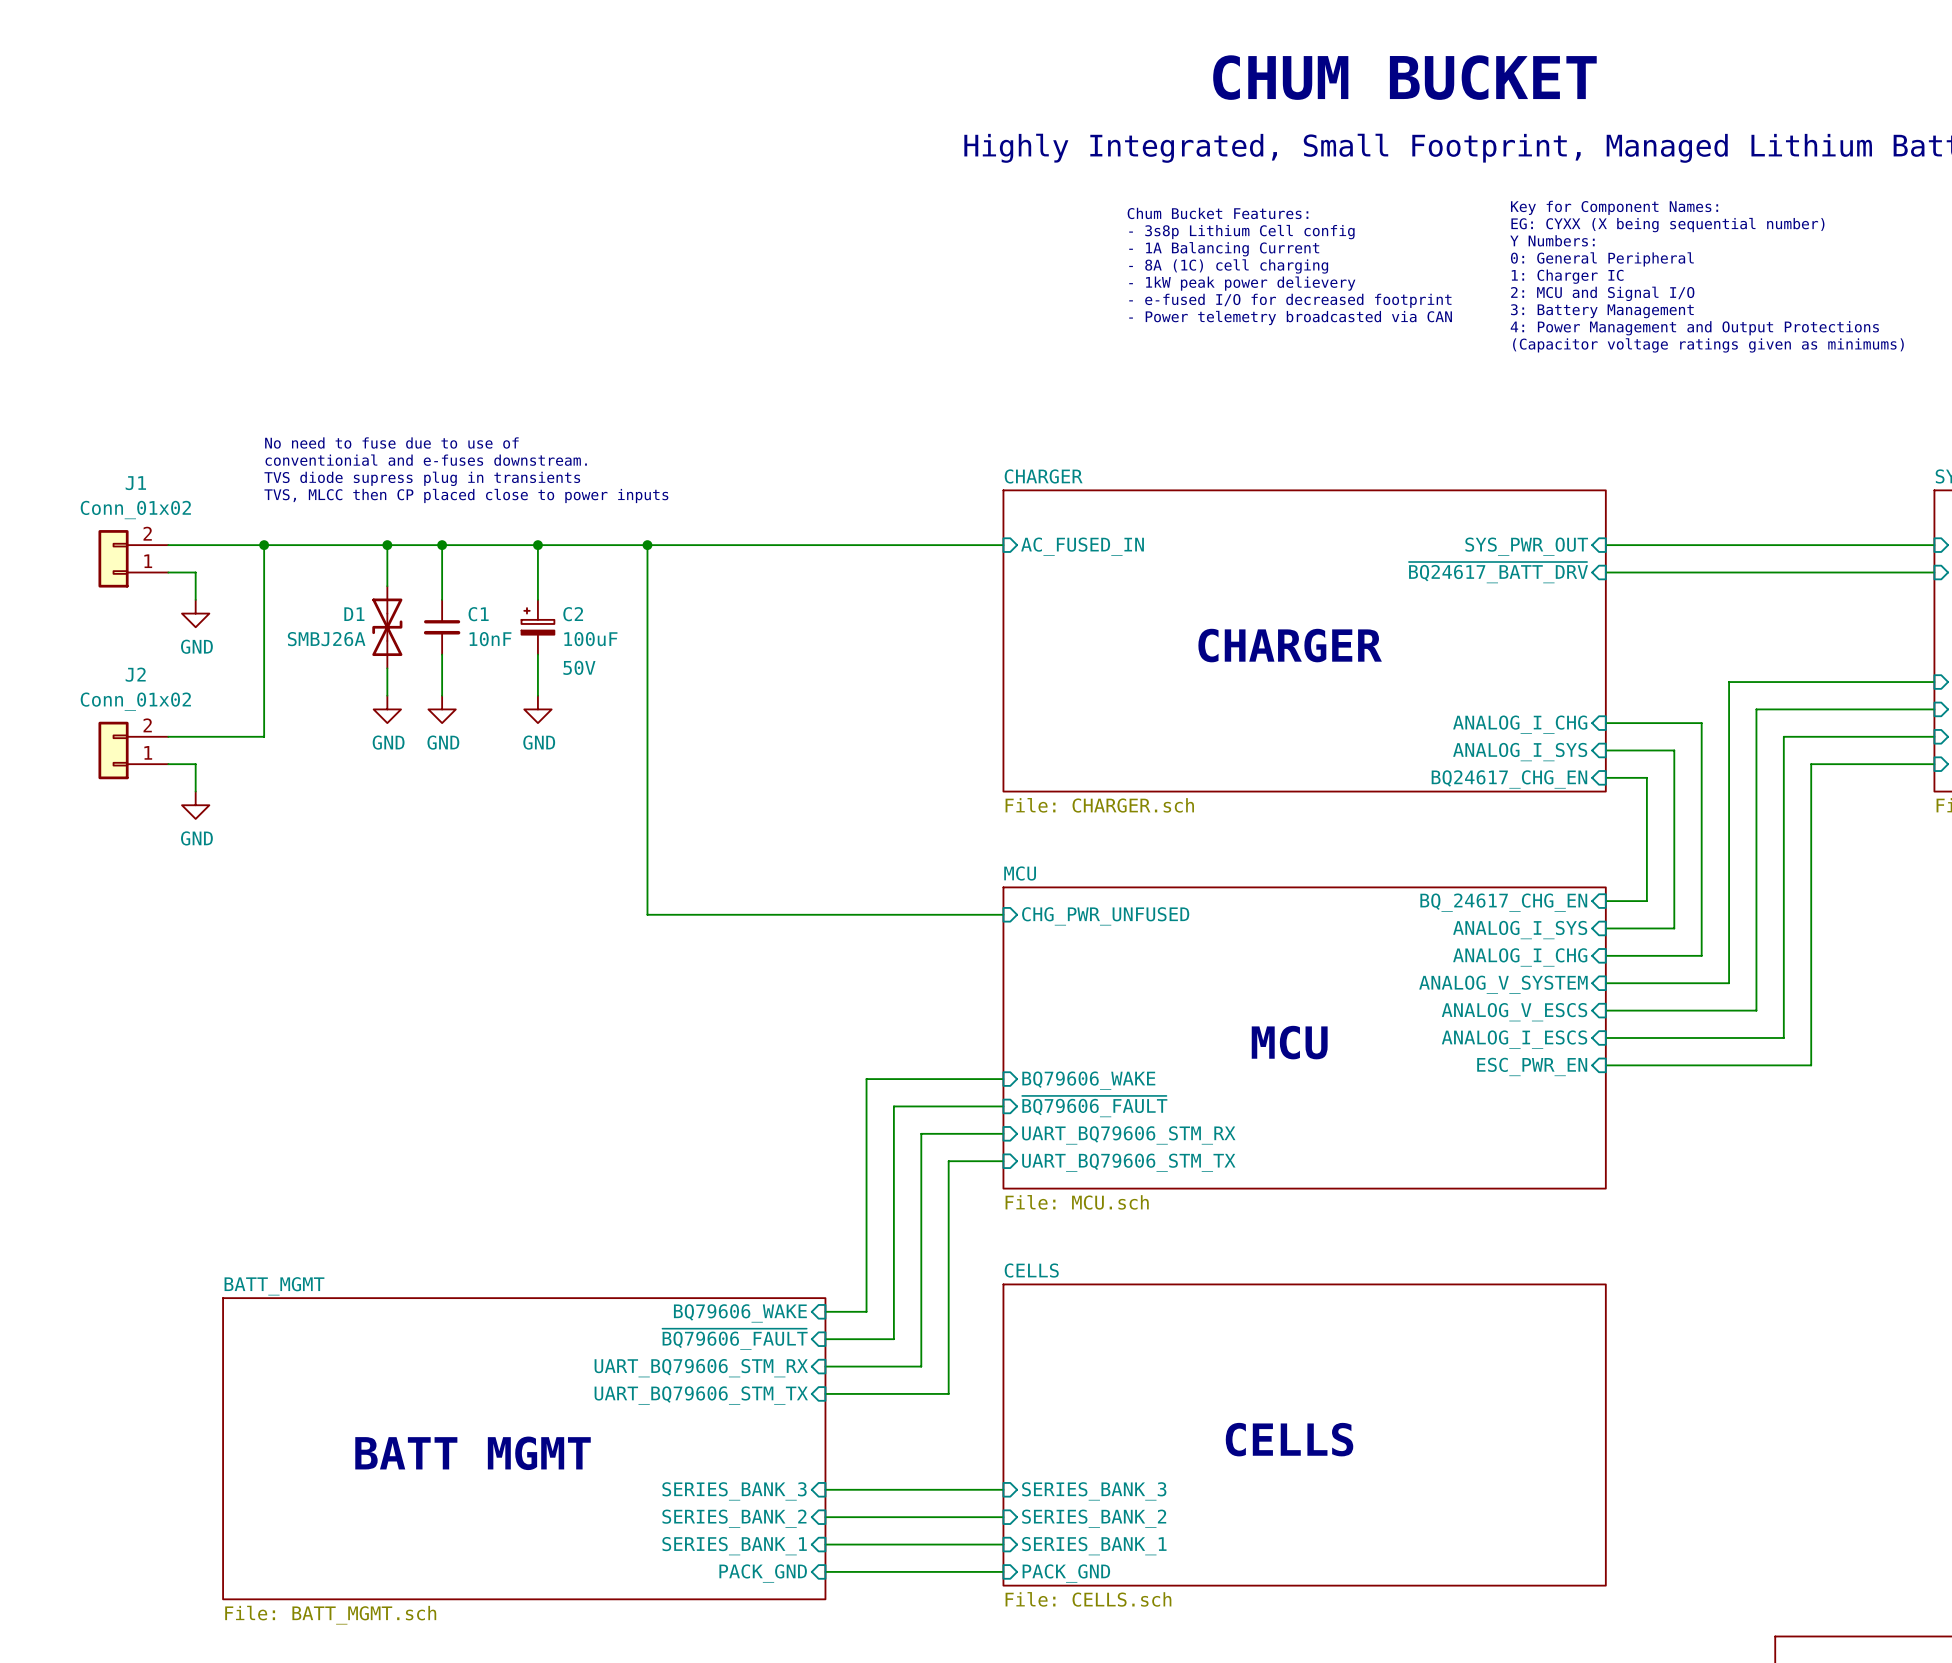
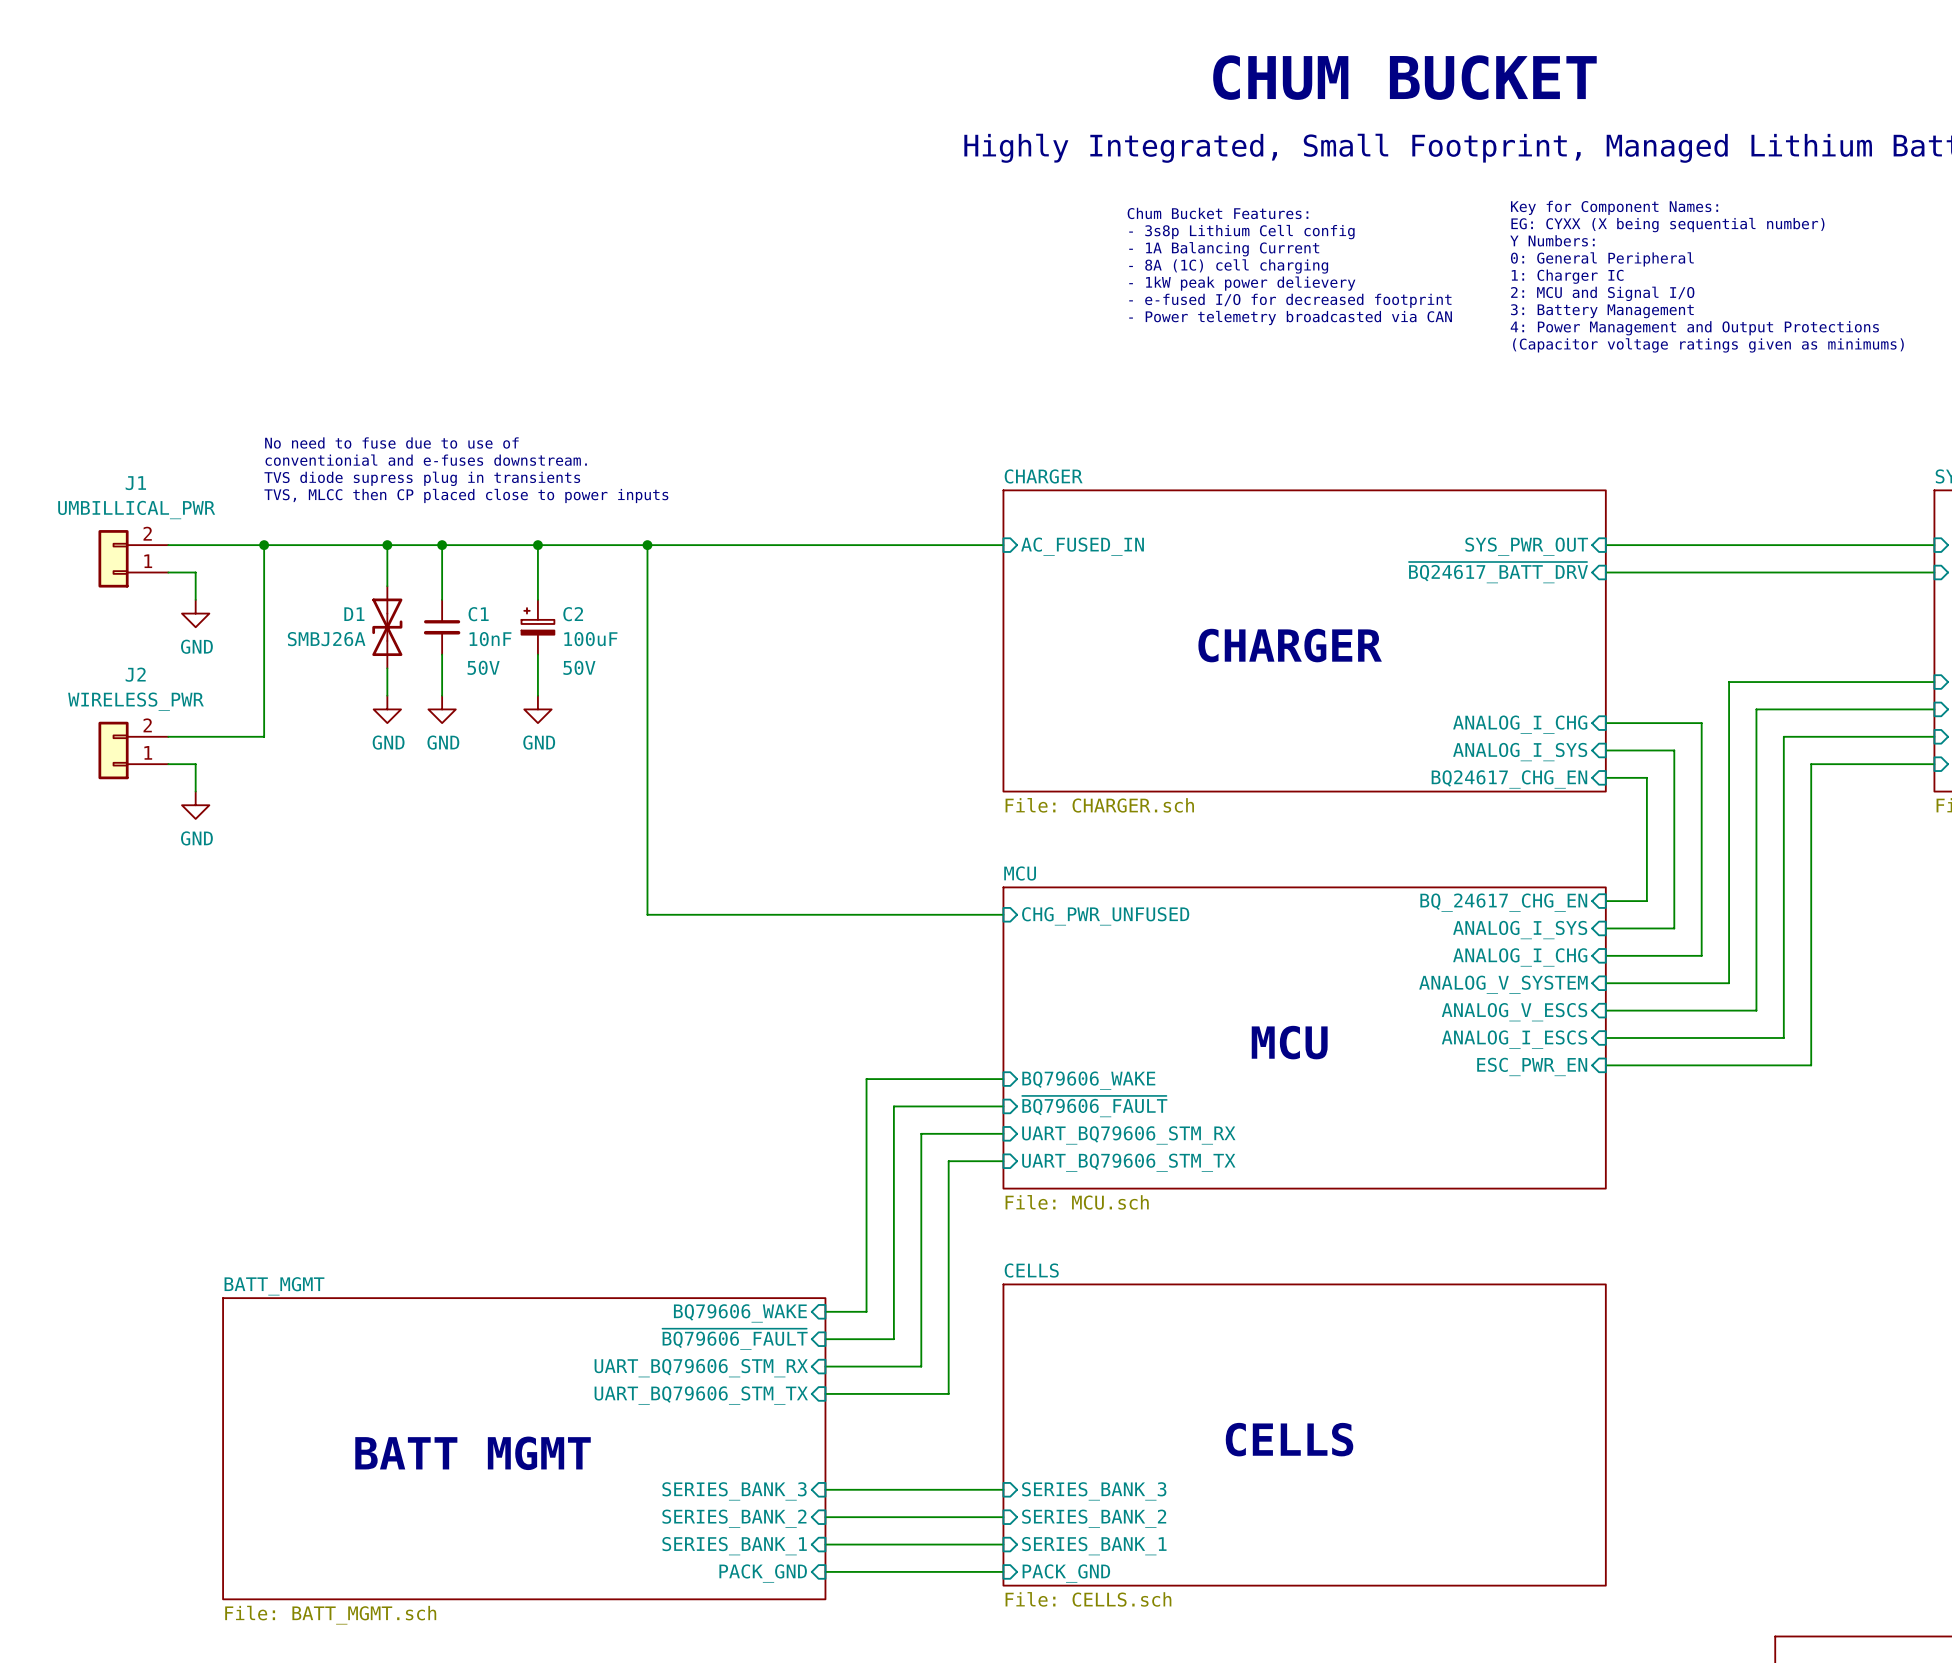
J1 value: Conn_01x02 (135, 510) -> UMBILLICAL_PWR (136, 510)
C1 text: none -> 50V (483, 667)
J2 value: Conn_01x02 (135, 701) -> WIRELESS_PWR (135, 701)

